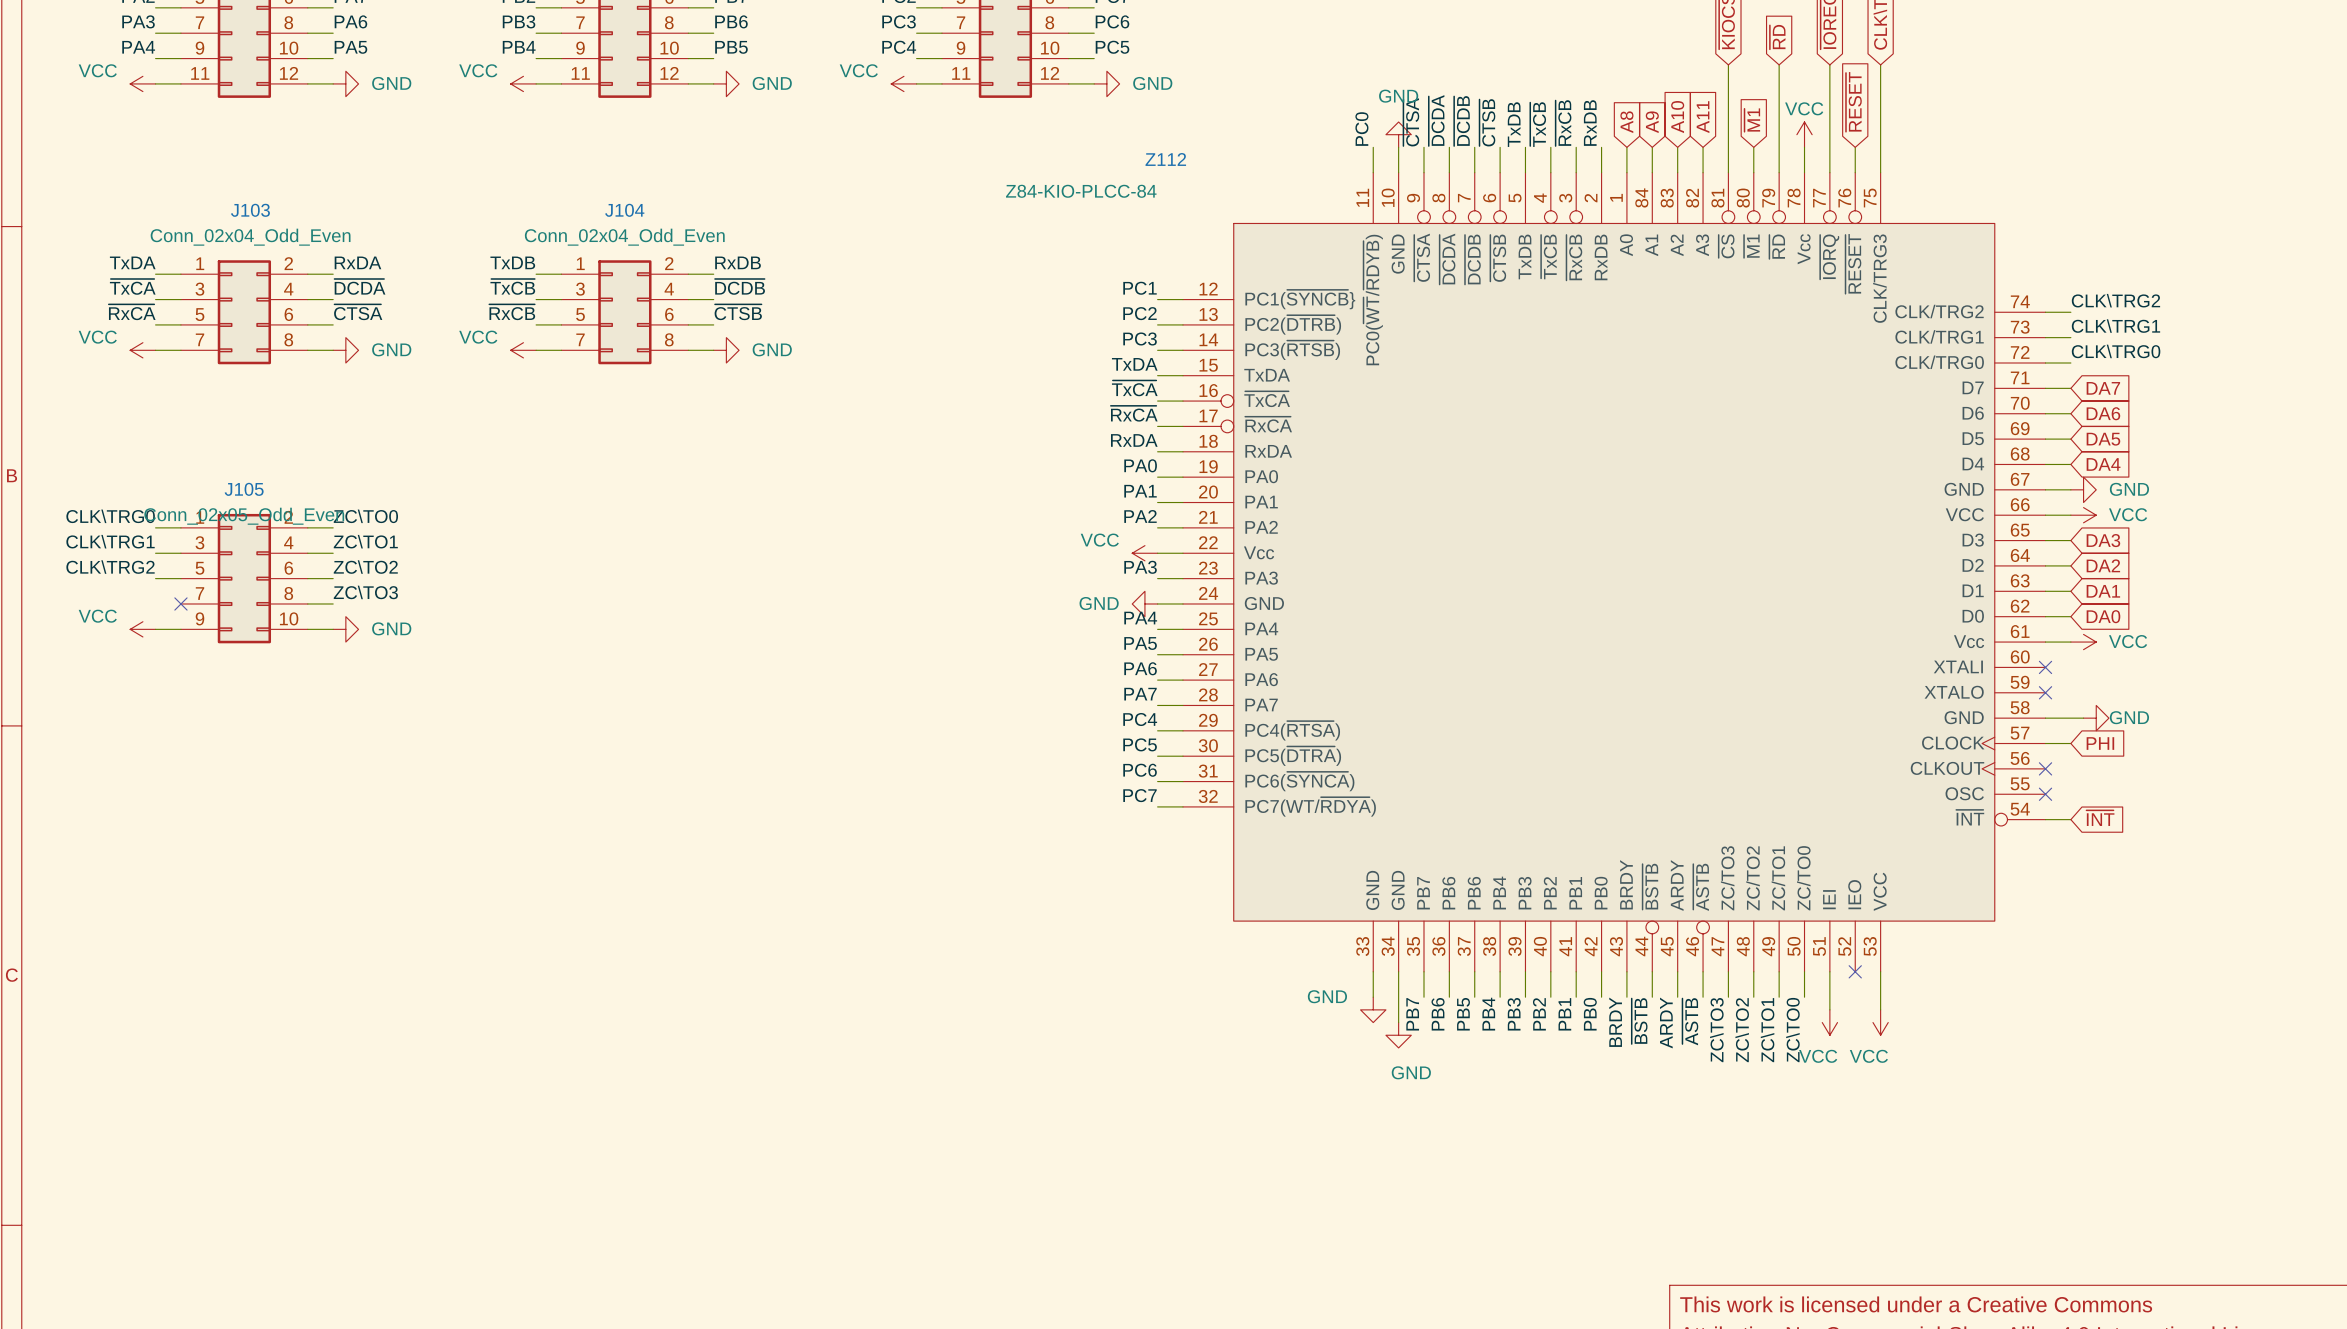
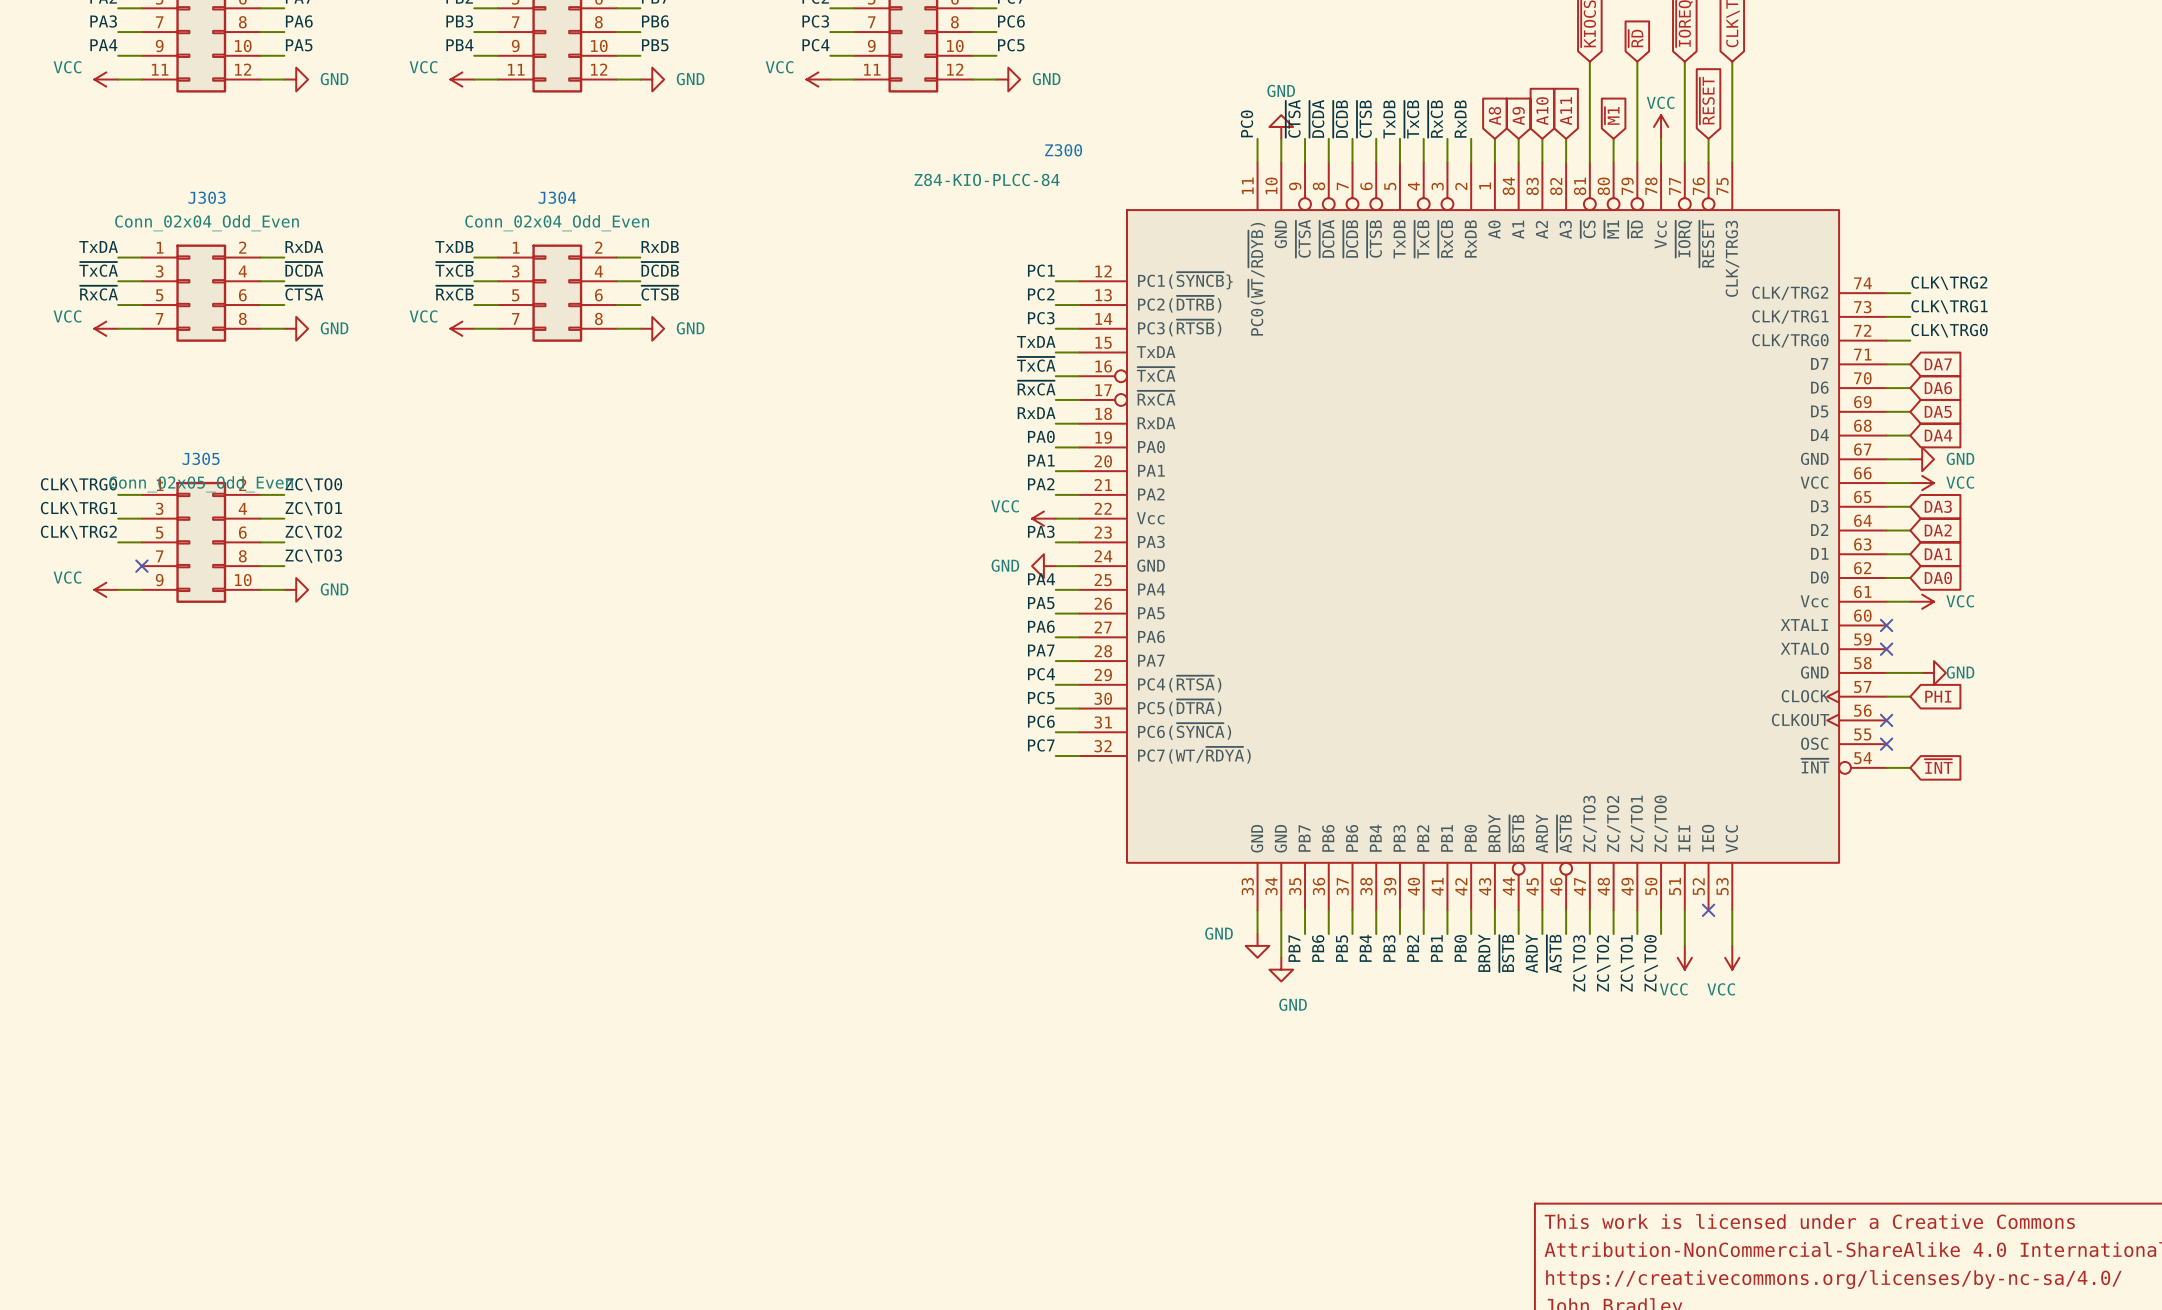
Z112 name: Z112 (1165, 159) -> Z300 (1063, 150)
J103 name: J103 (250, 210) -> J303 (207, 197)
J104 name: J104 (624, 210) -> J304 (557, 197)
J105 name: J105 (244, 489) -> J305 (201, 458)

